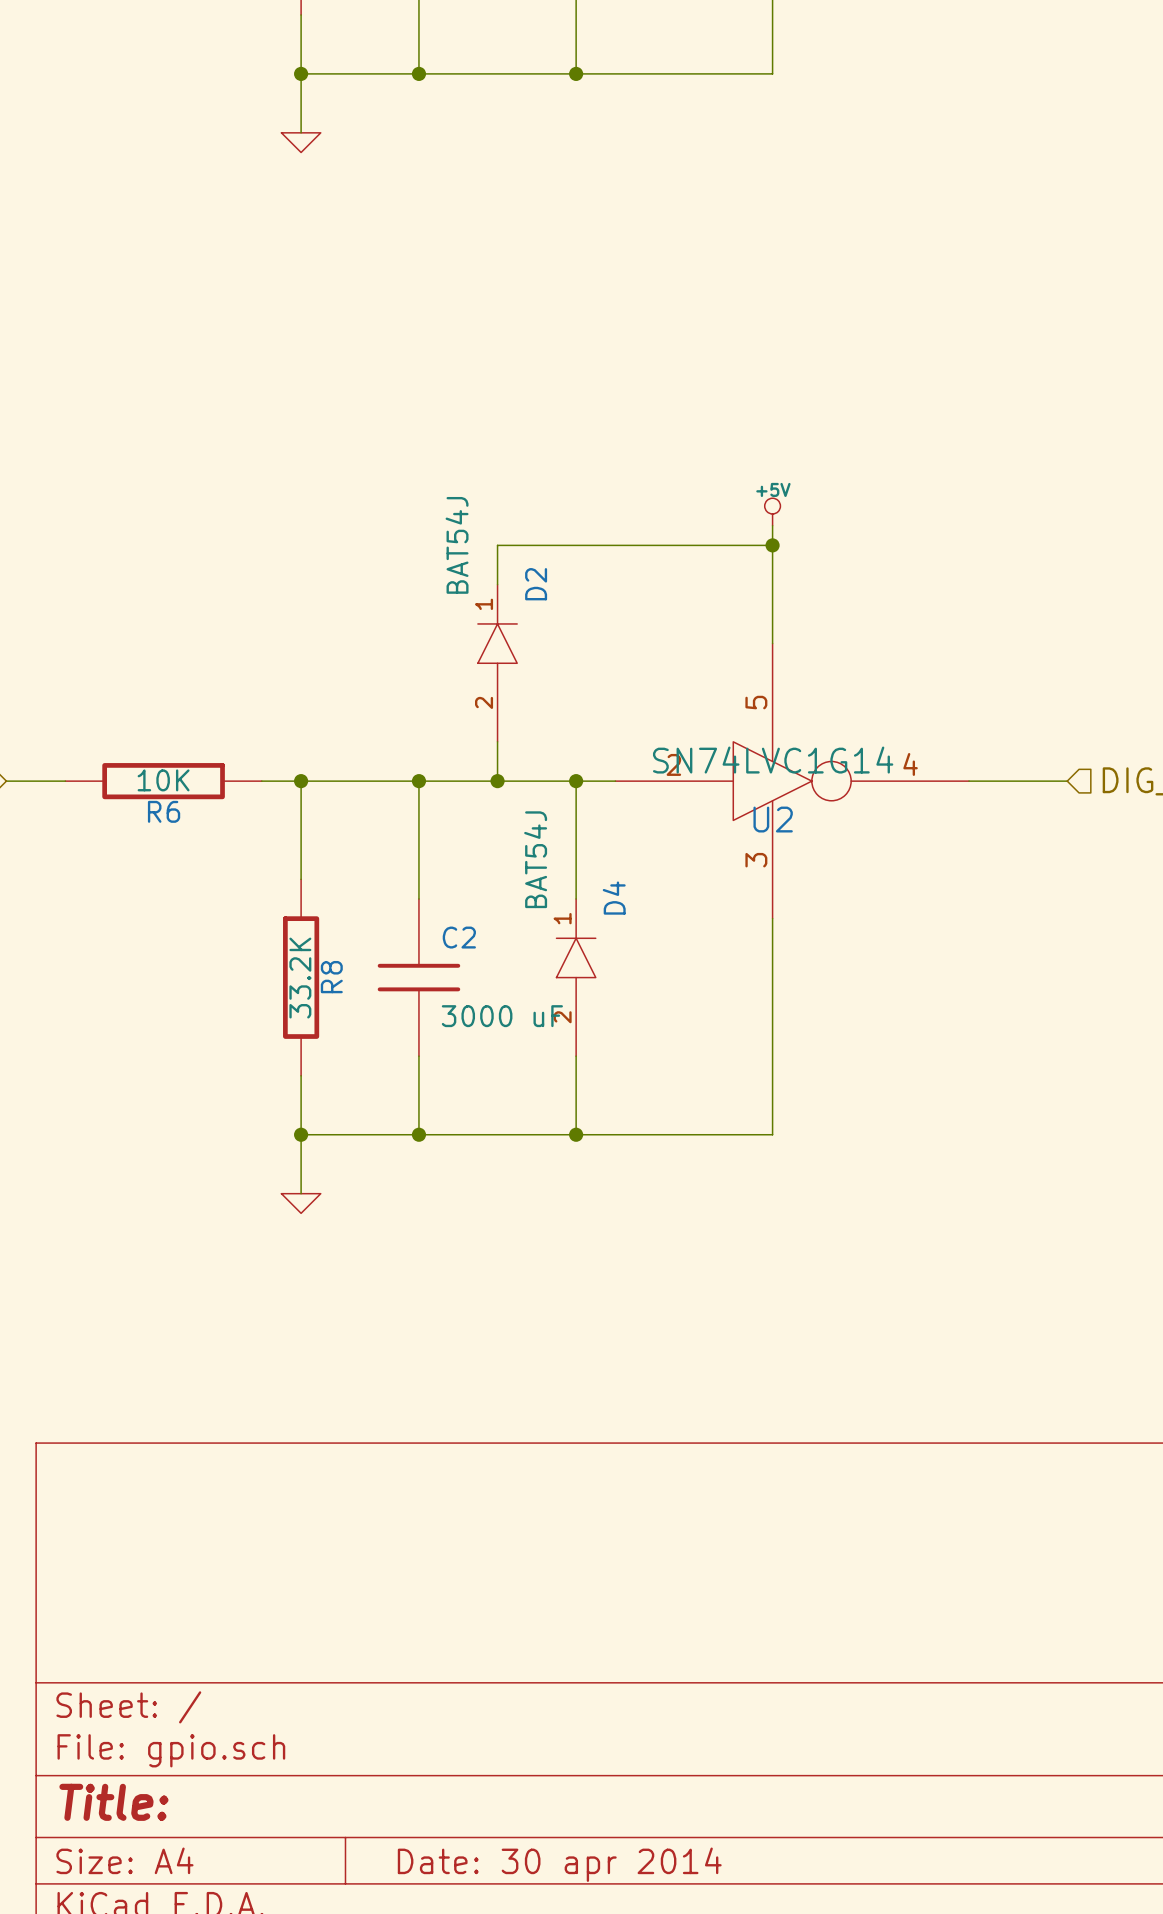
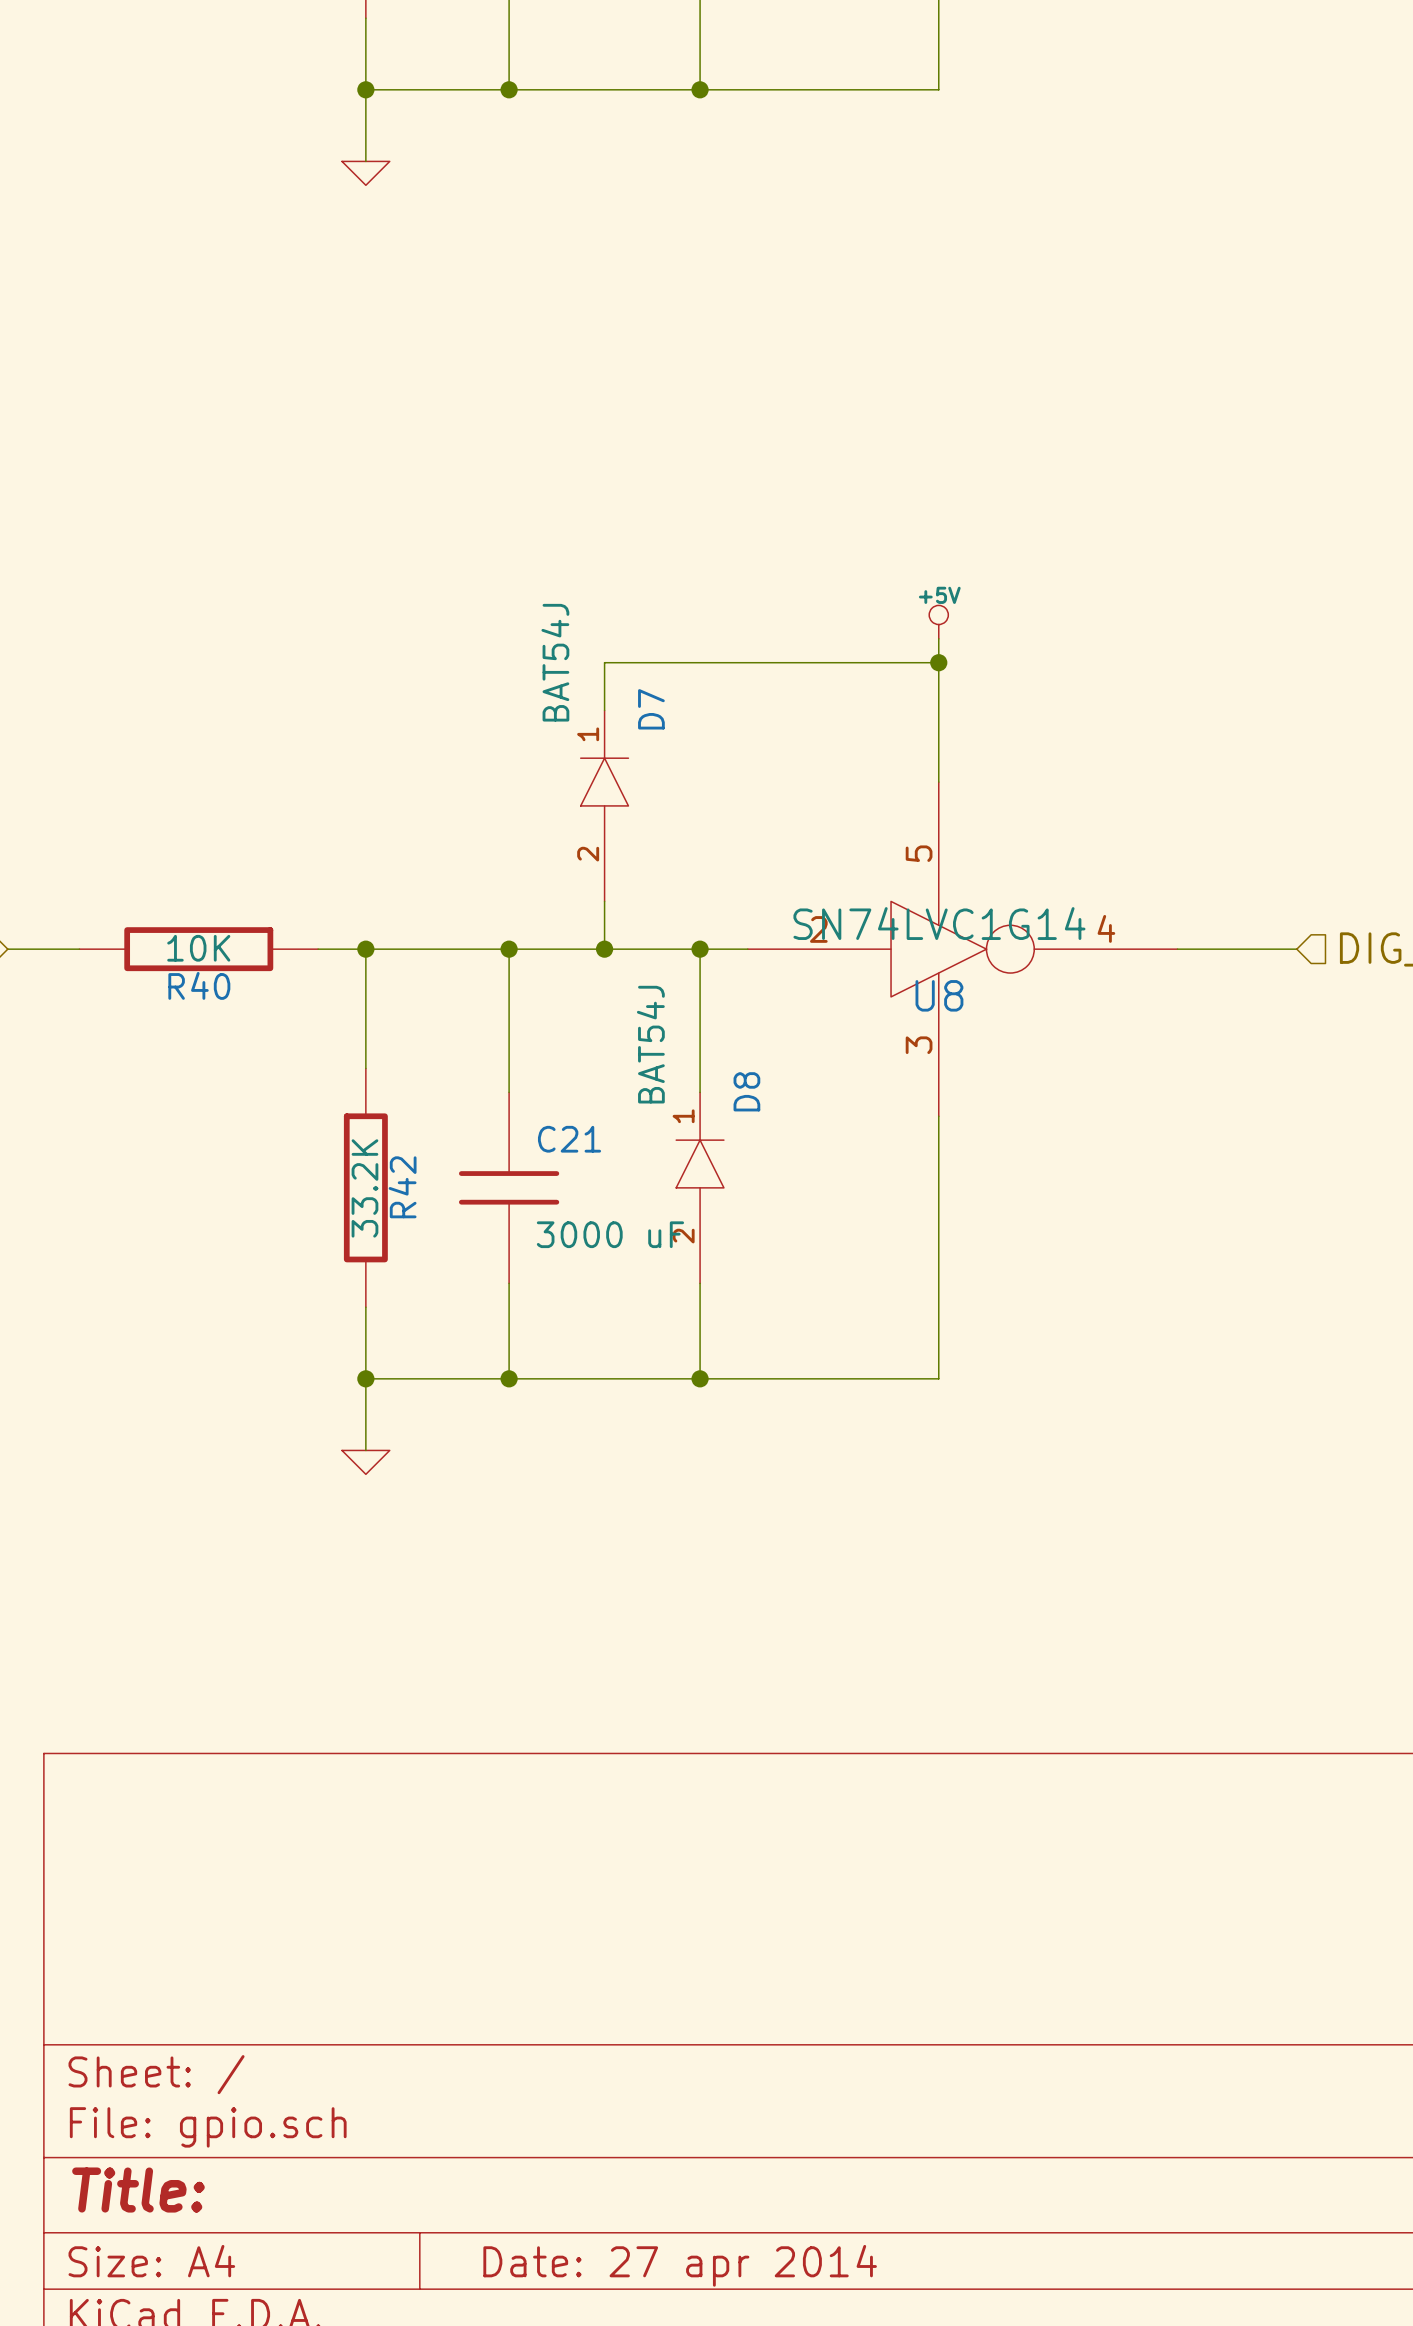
D2 name: D2 (536, 584) -> D7 (651, 709)
R6 name: R6 (164, 811) -> R40 (199, 985)
U2 name: U2 (773, 819) -> U8 (939, 995)
D4 name: D4 (614, 898) -> D8 (746, 1091)
C2 name: C2 (459, 937) -> C21 (569, 1139)
R8 name: R8 (331, 977) -> R42 (402, 1187)
title block: Date: 30 apr 2014 (559, 1864) -> Date: 27 apr 2014 (680, 2265)

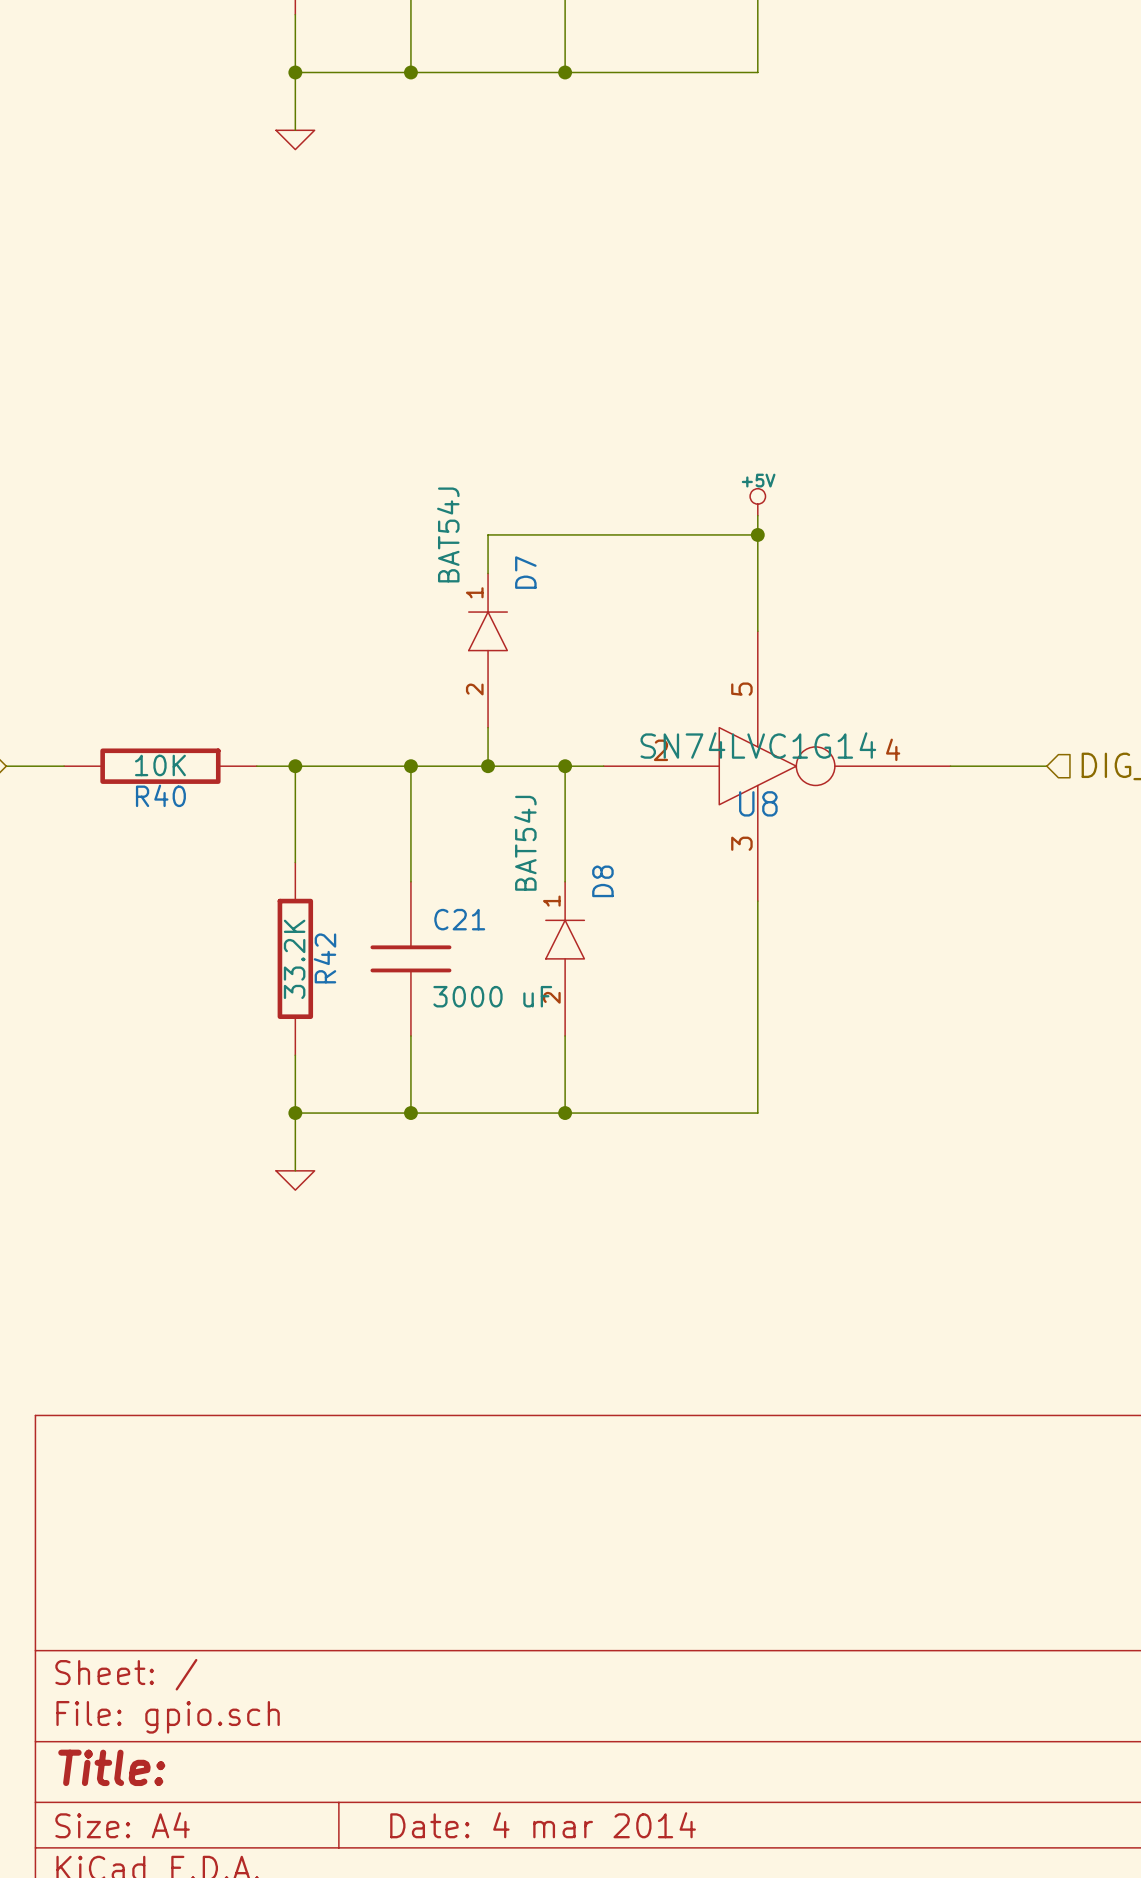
title block: Date: 27 apr 2014 (680, 2265) -> Date: 4 mar 2014 (543, 1825)

